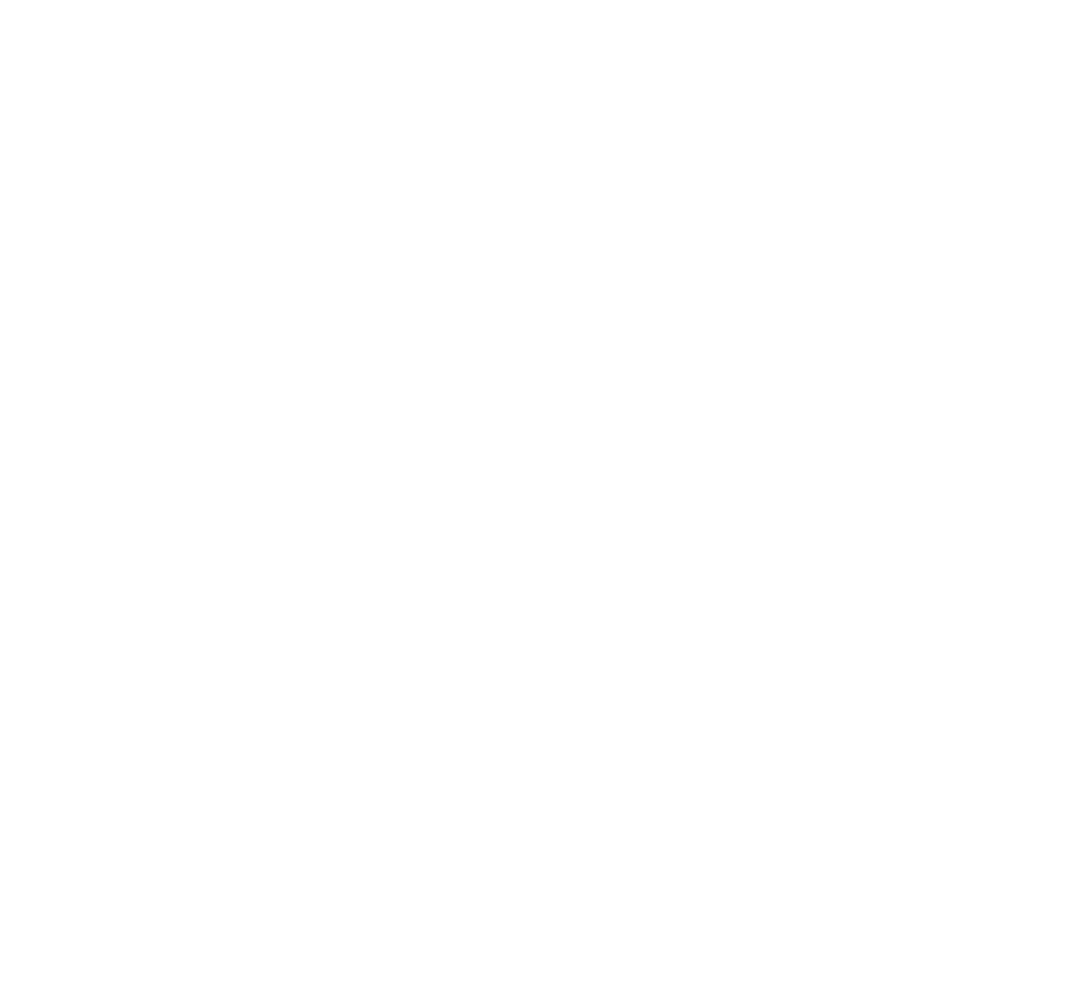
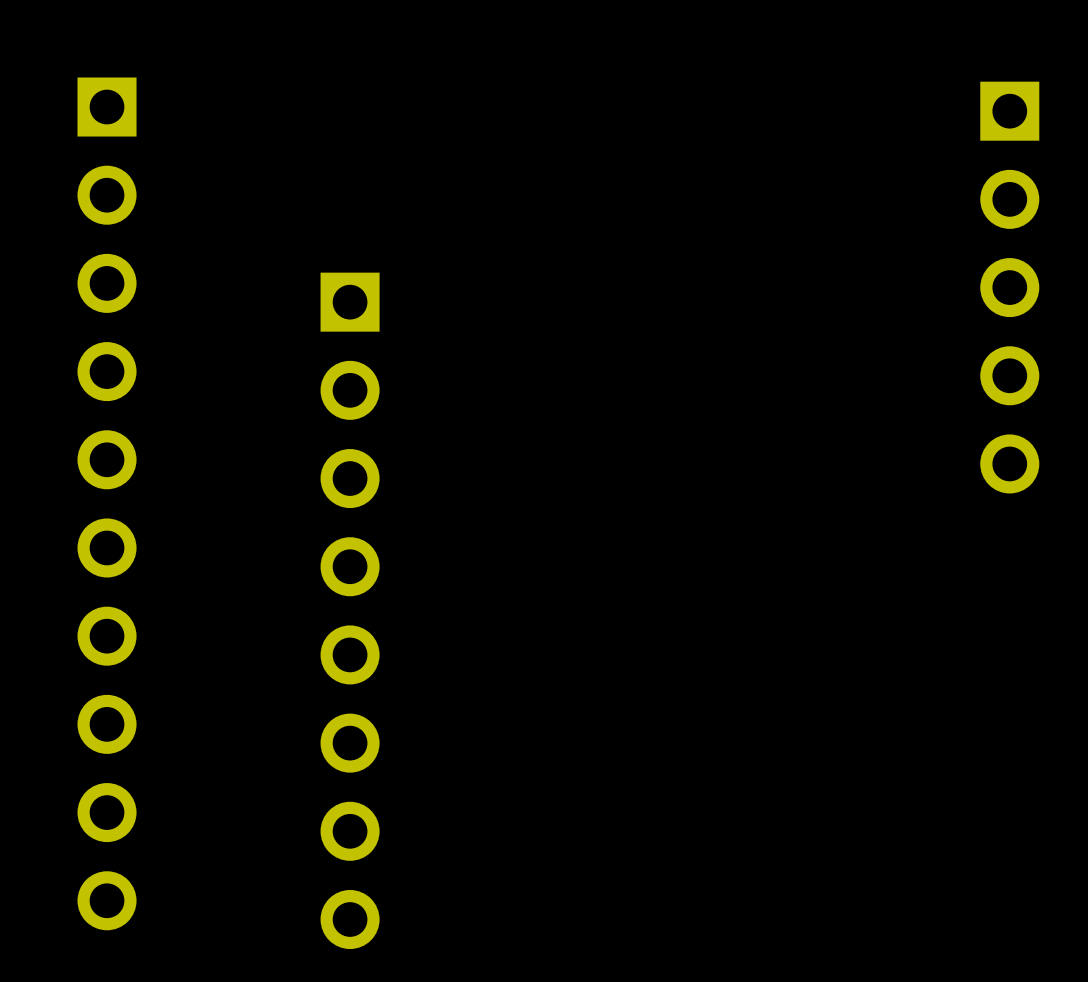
part: none -> (1009, 287)
part: none -> (107, 503)
part: none -> (350, 610)

